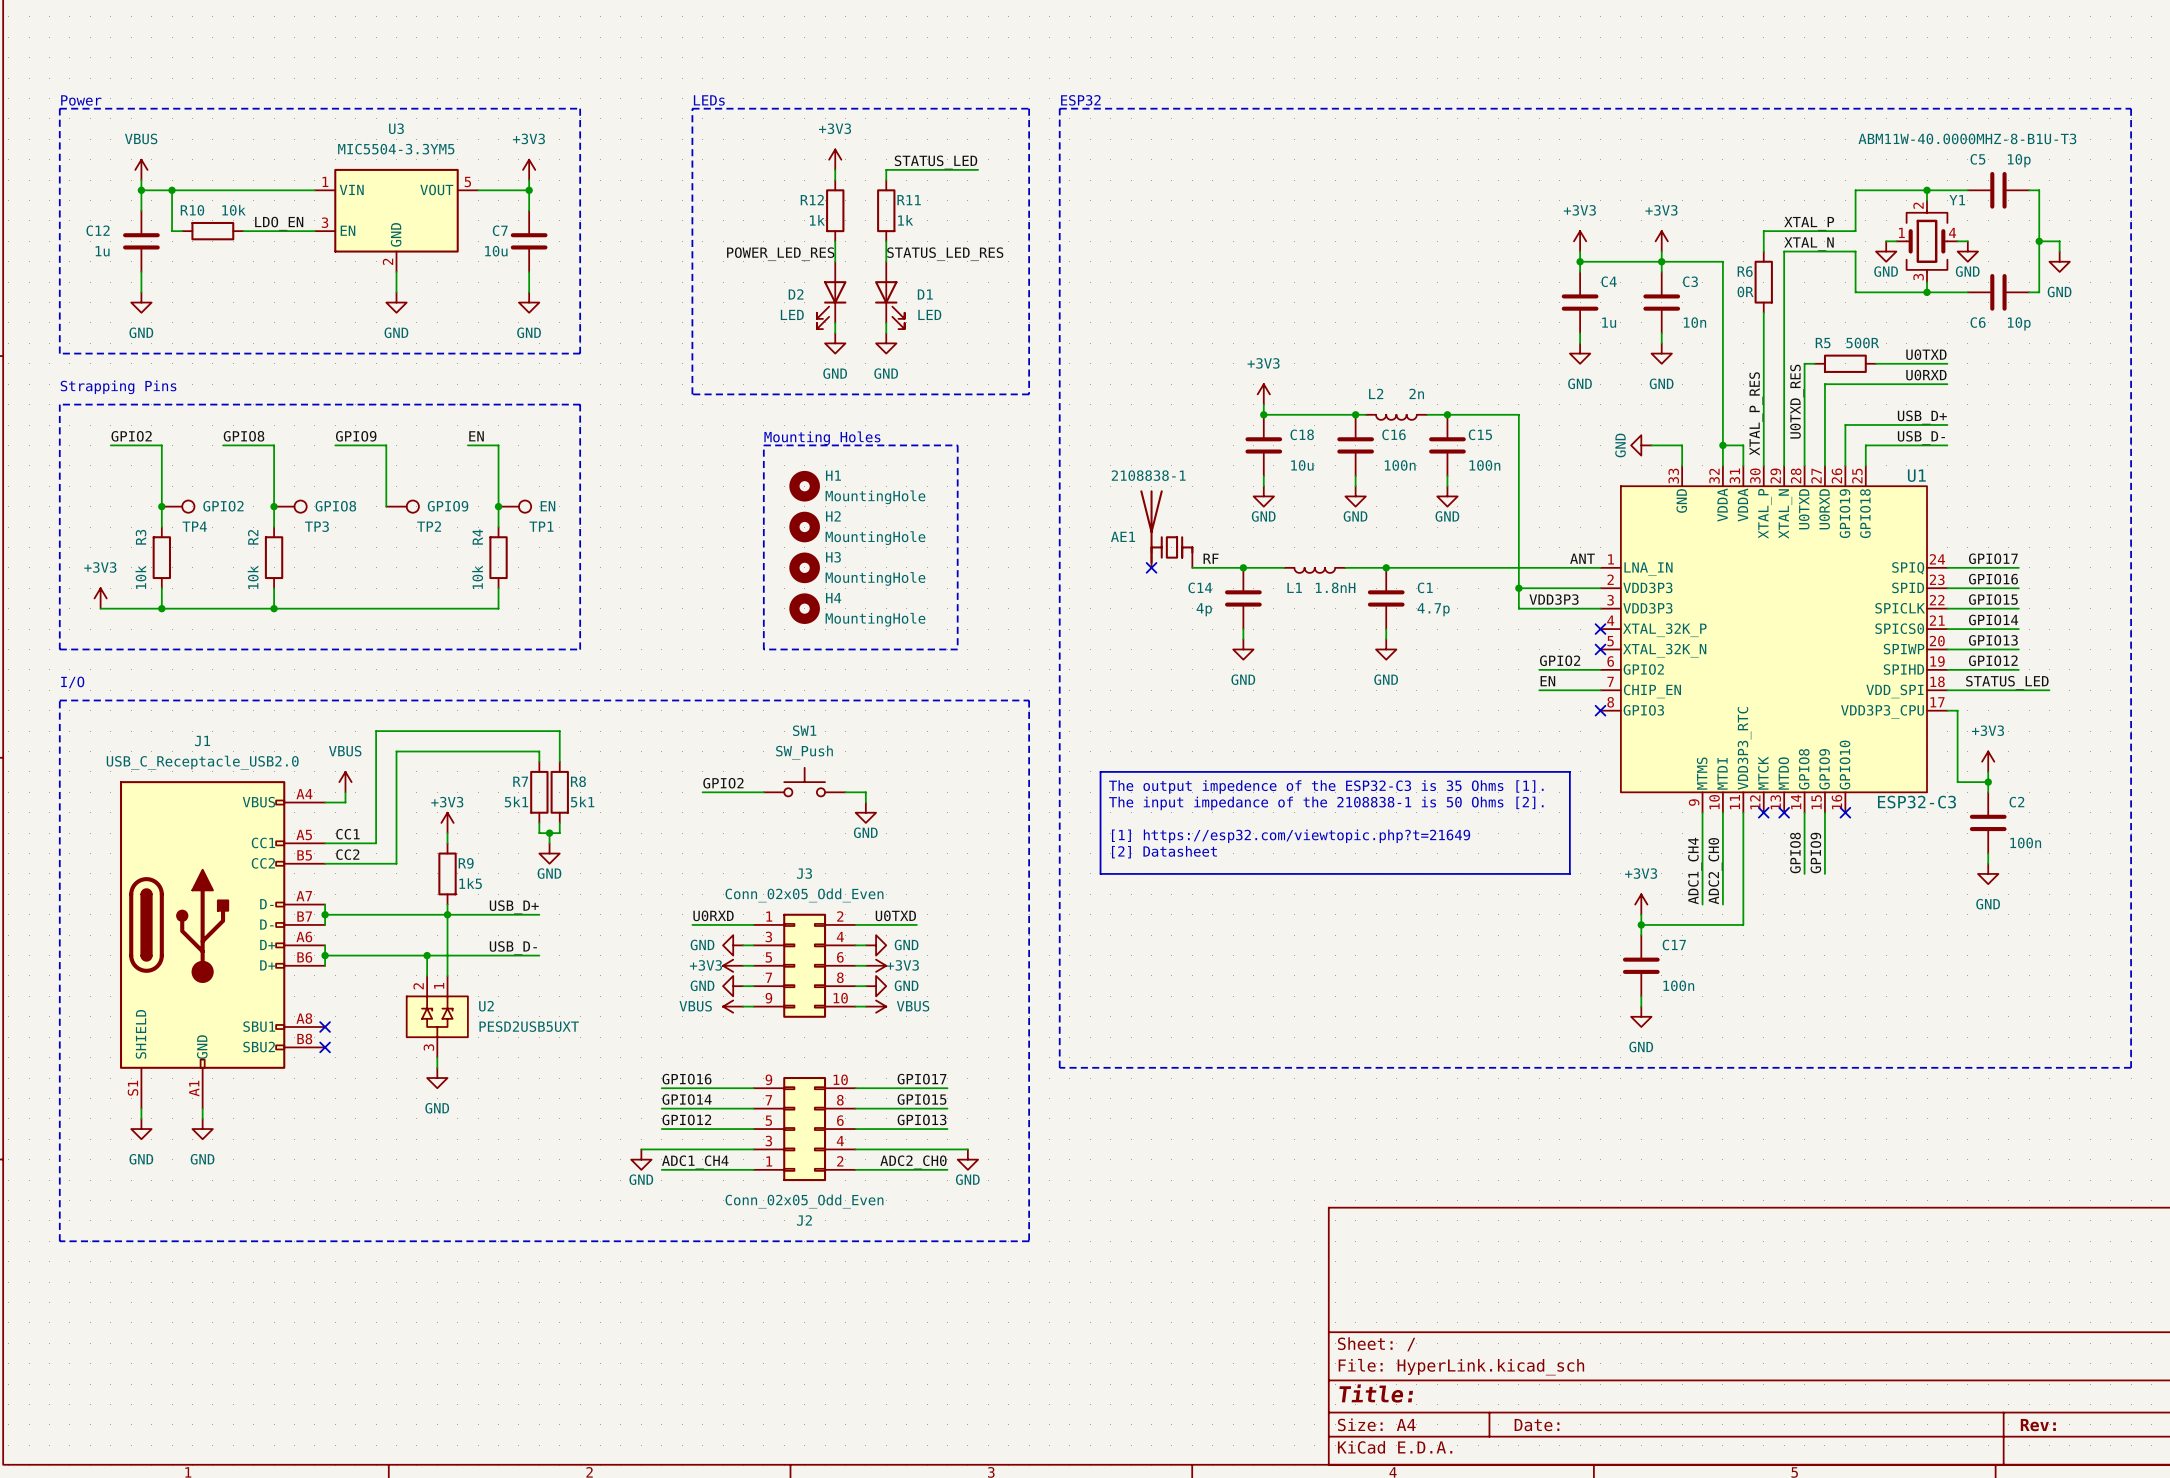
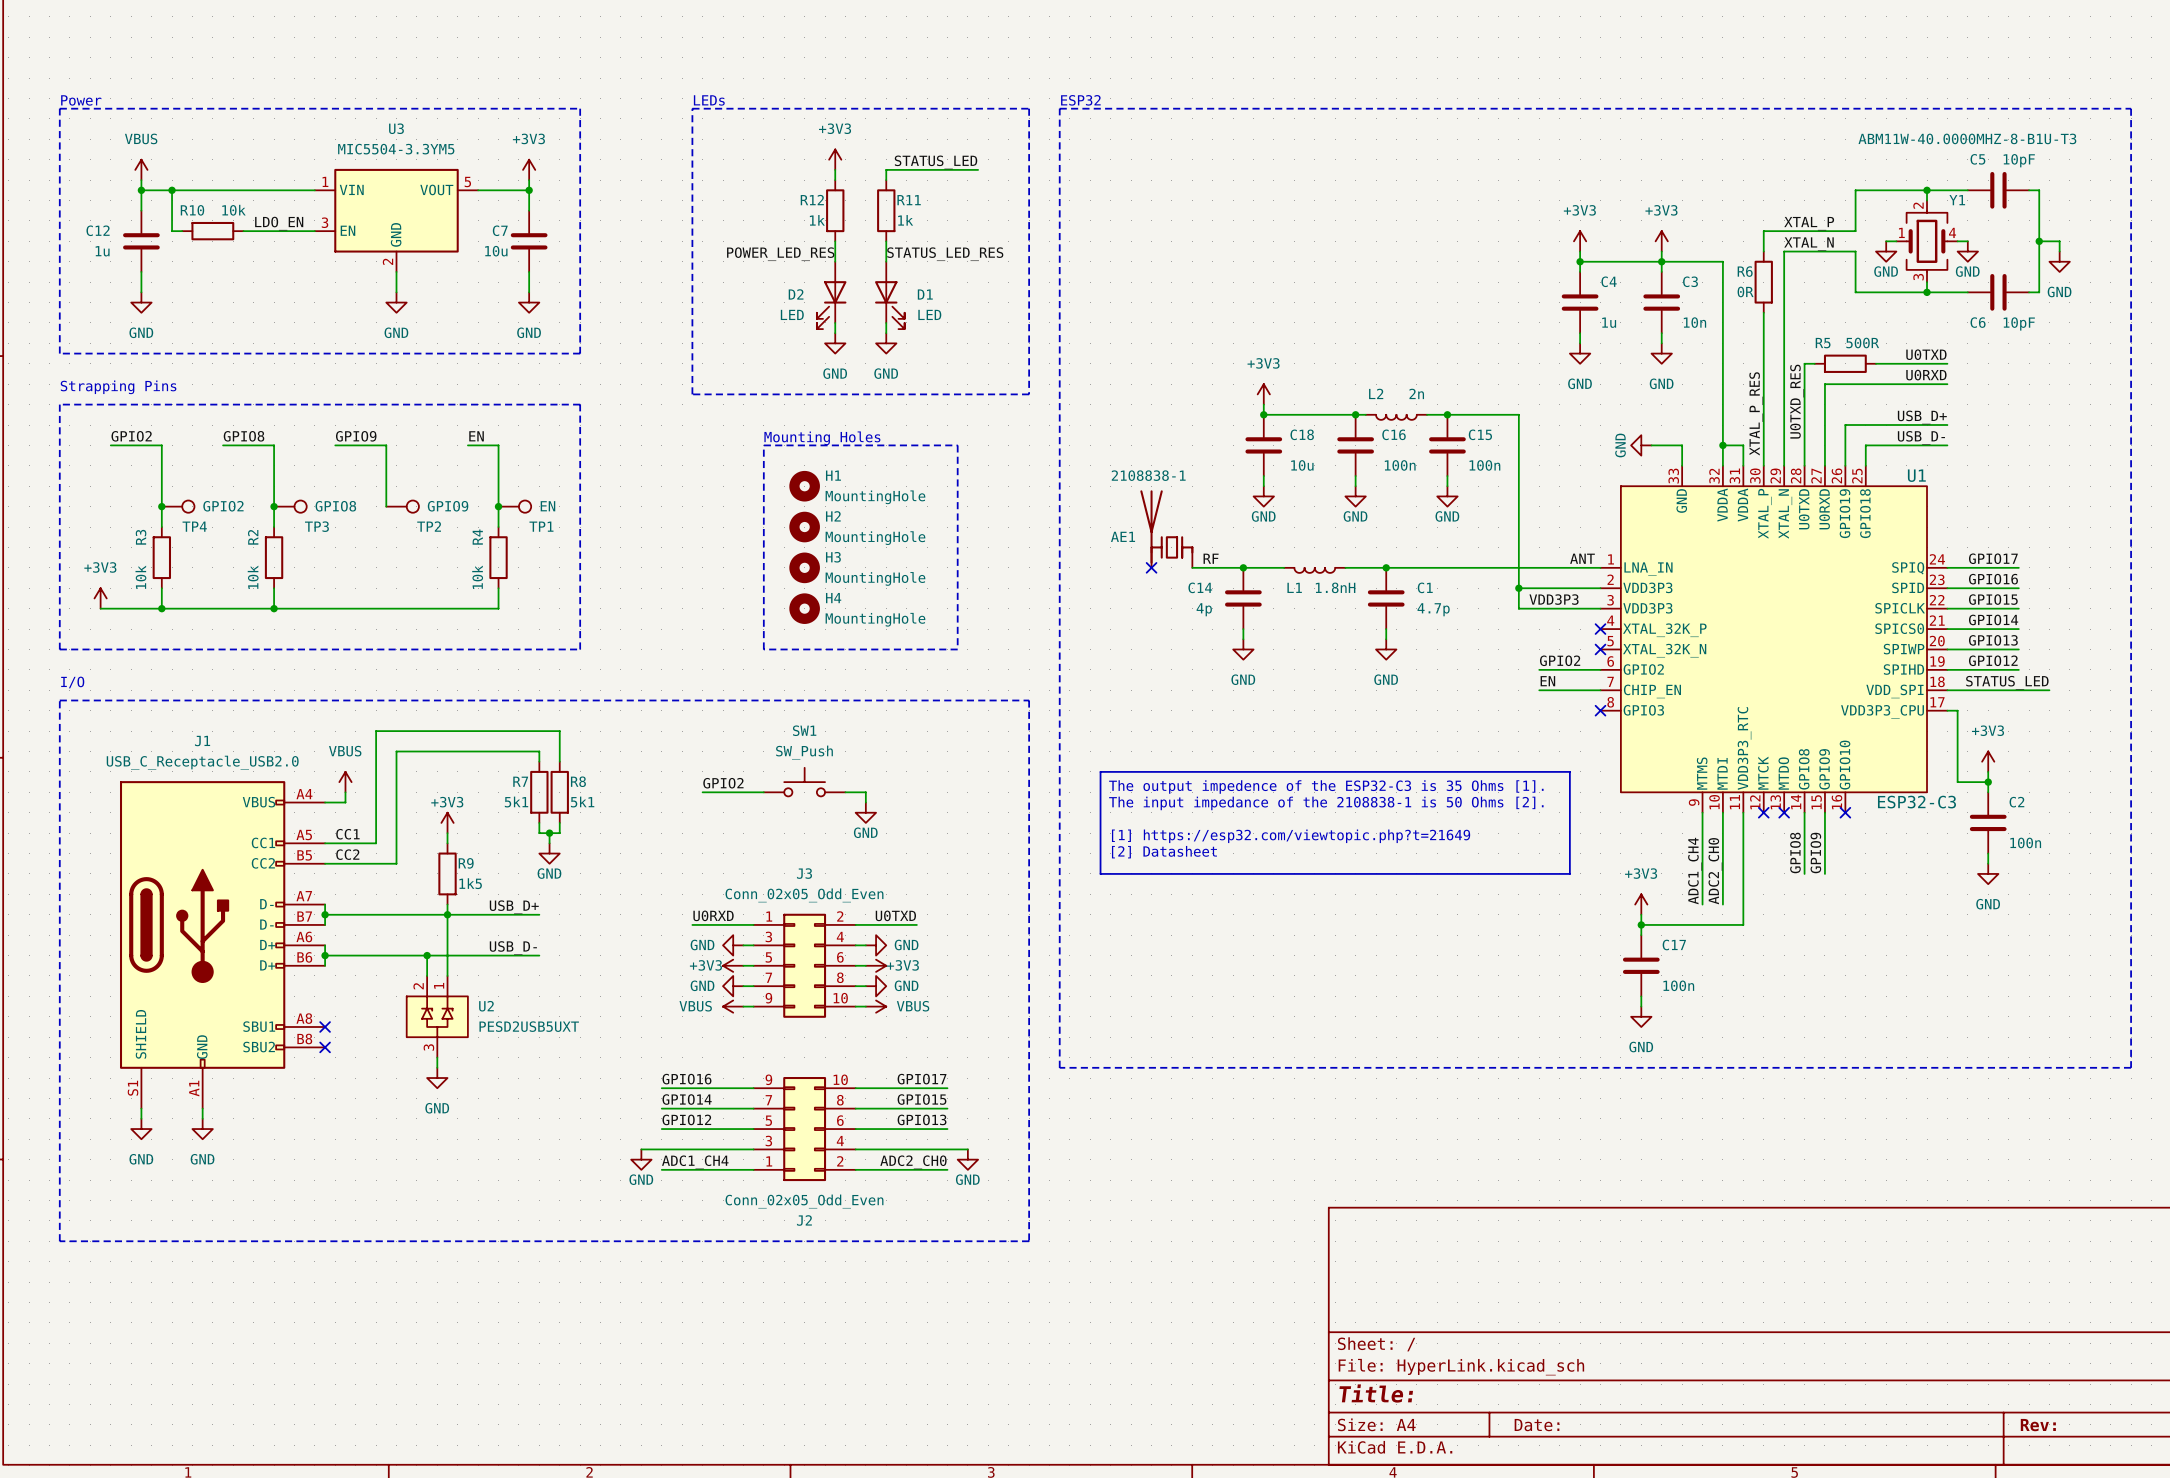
C5 value: 10p (2019, 160) -> 10pF (2019, 160)
C6 value: 10p (2019, 323) -> 10pF (2019, 323)

